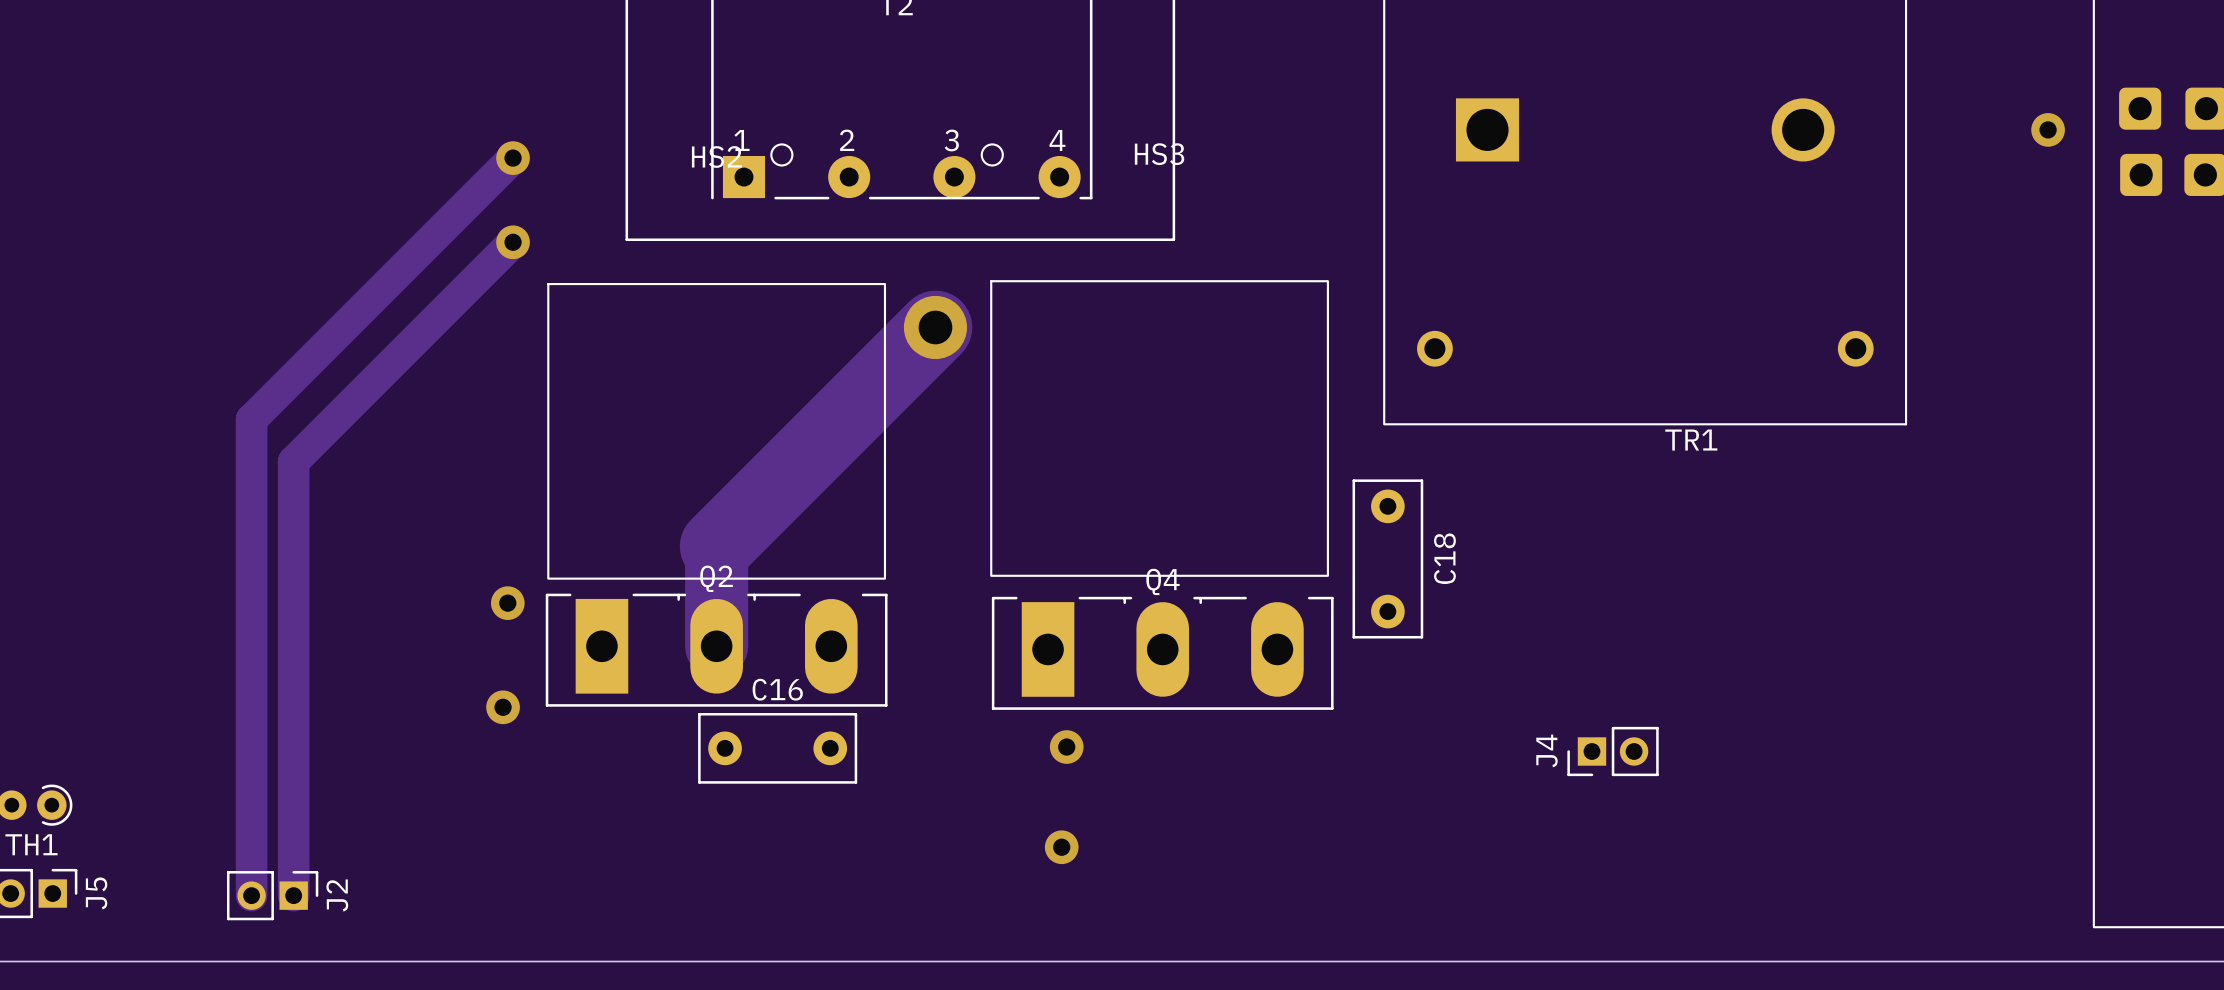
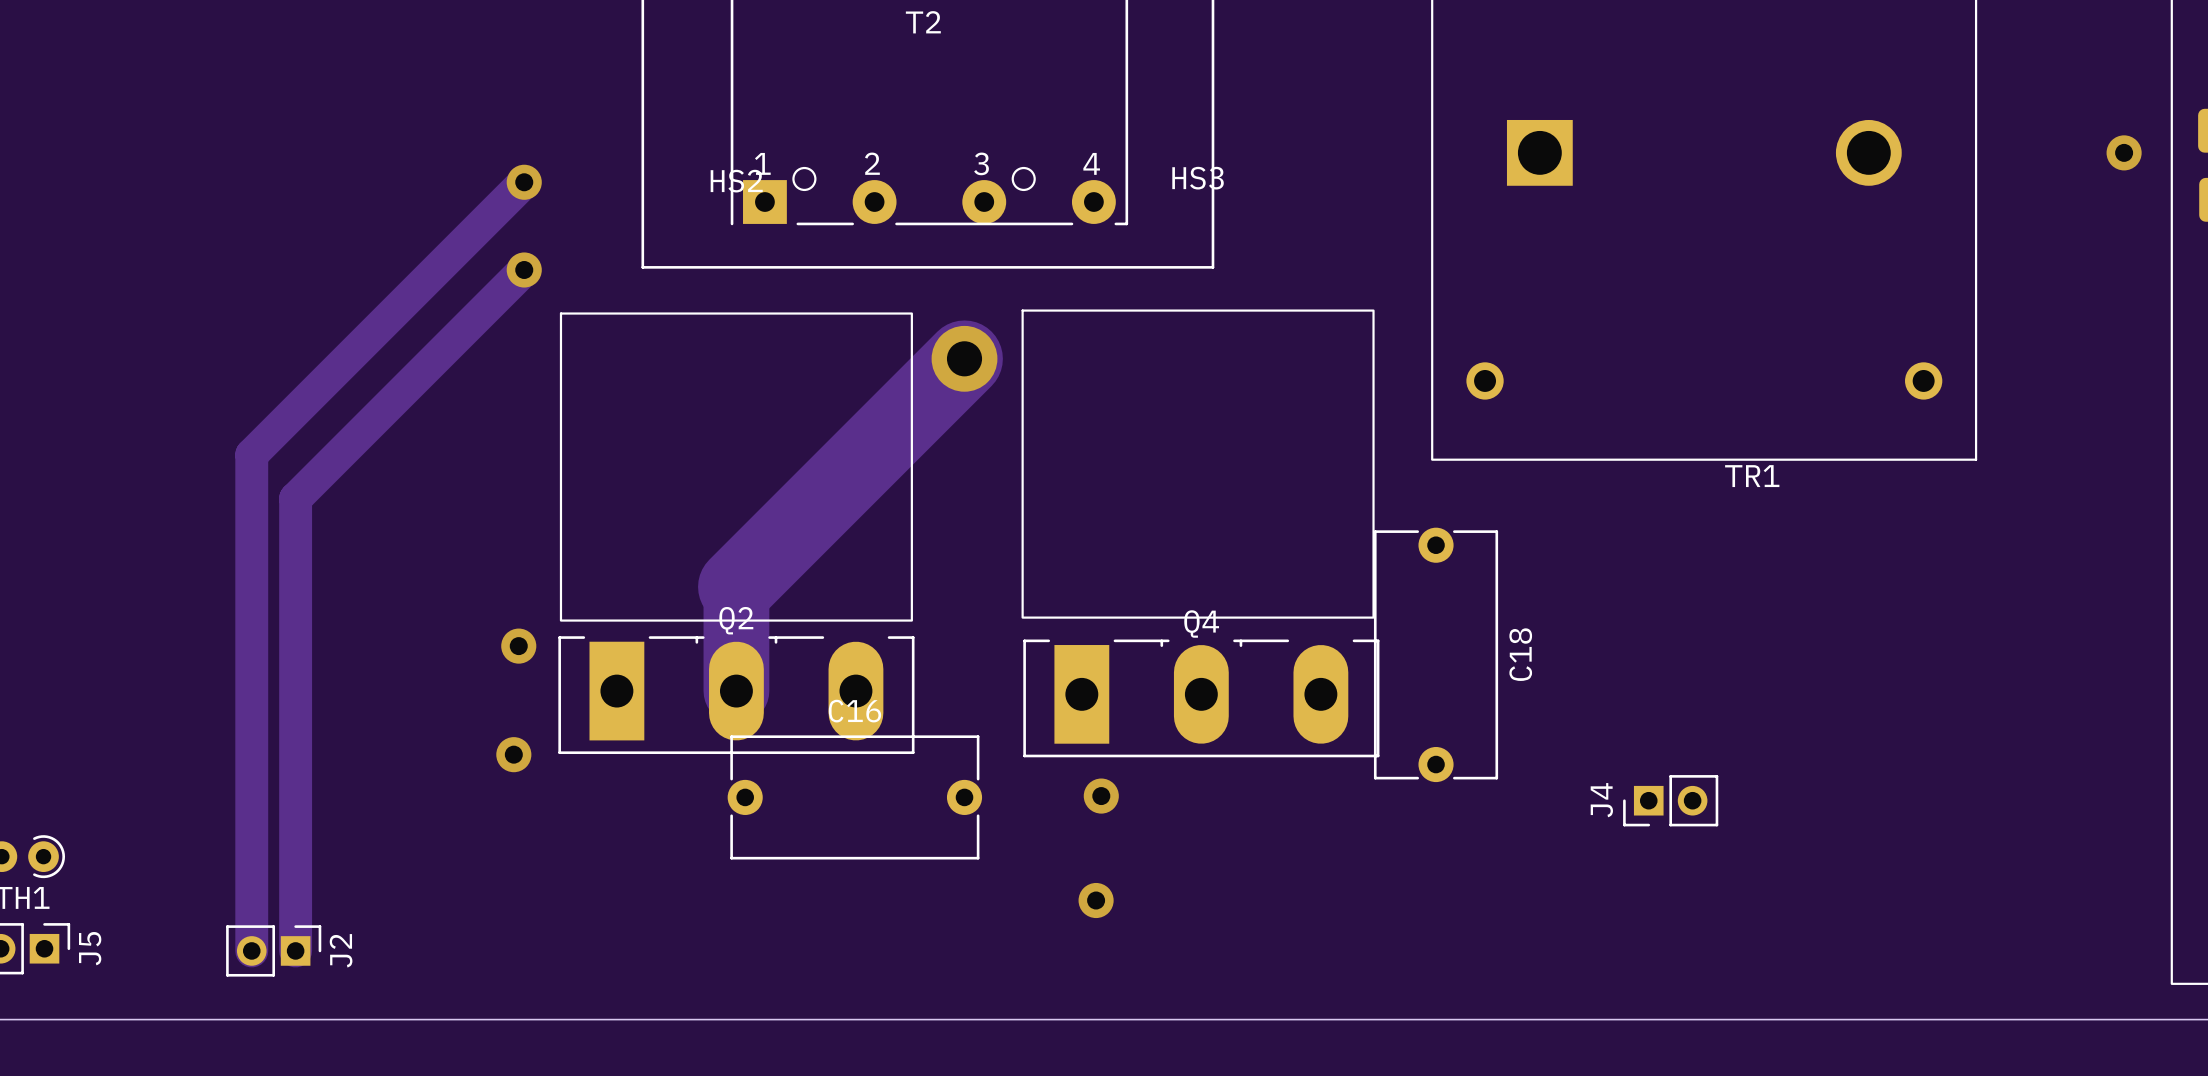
C18 footprint: [1352, 479, 1424, 639] -> [1373, 527, 1499, 783]
C16 footprint: [698, 712, 858, 784] -> [727, 735, 983, 860]

